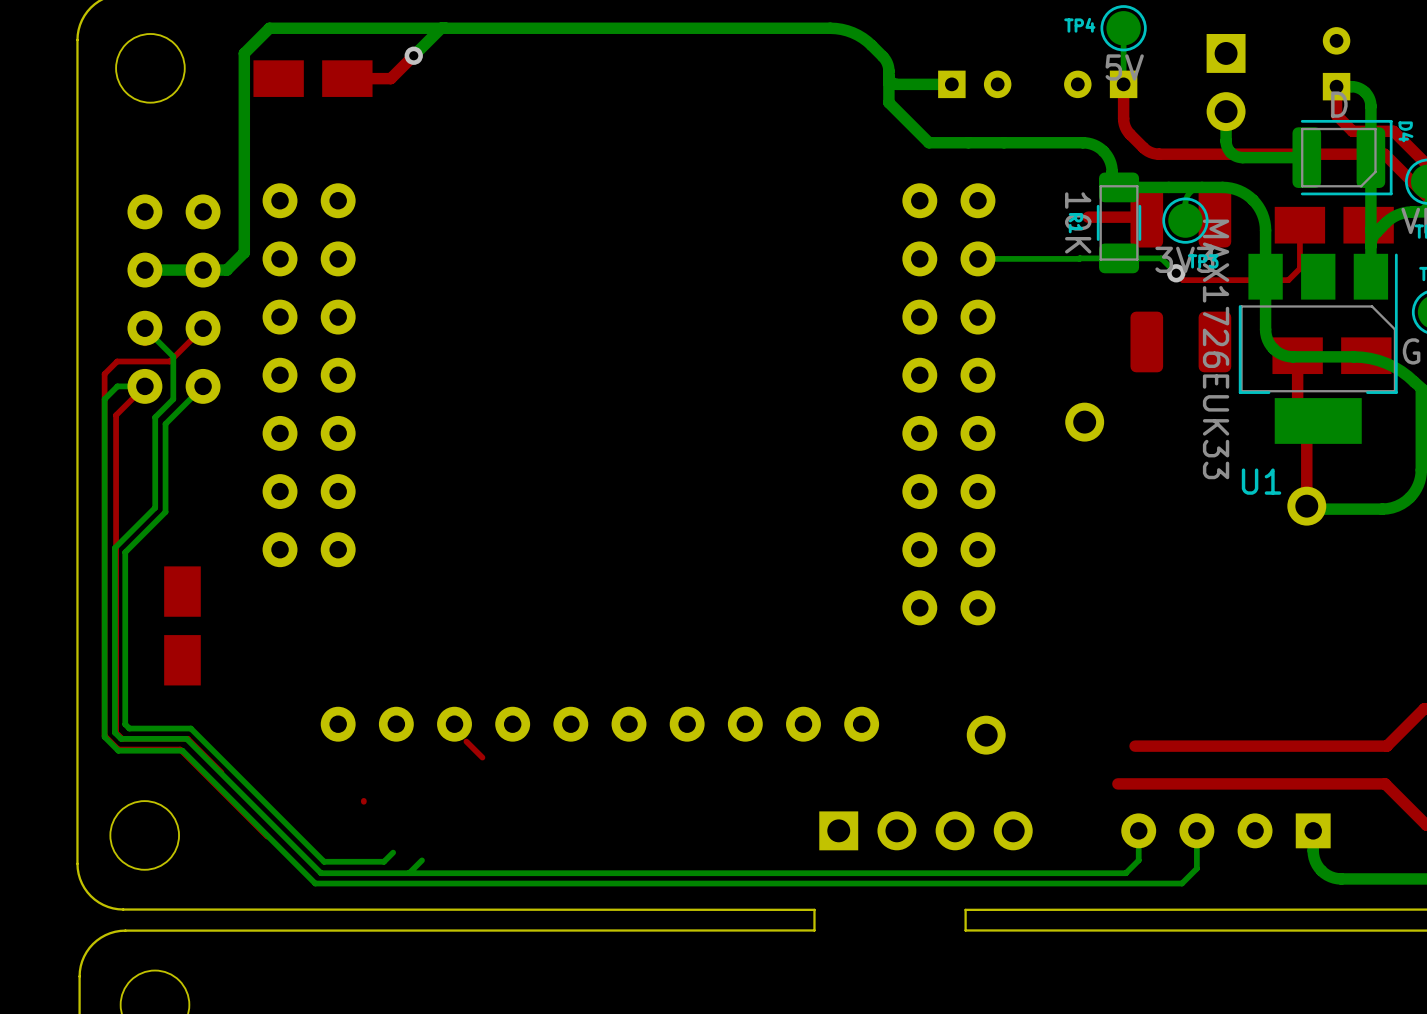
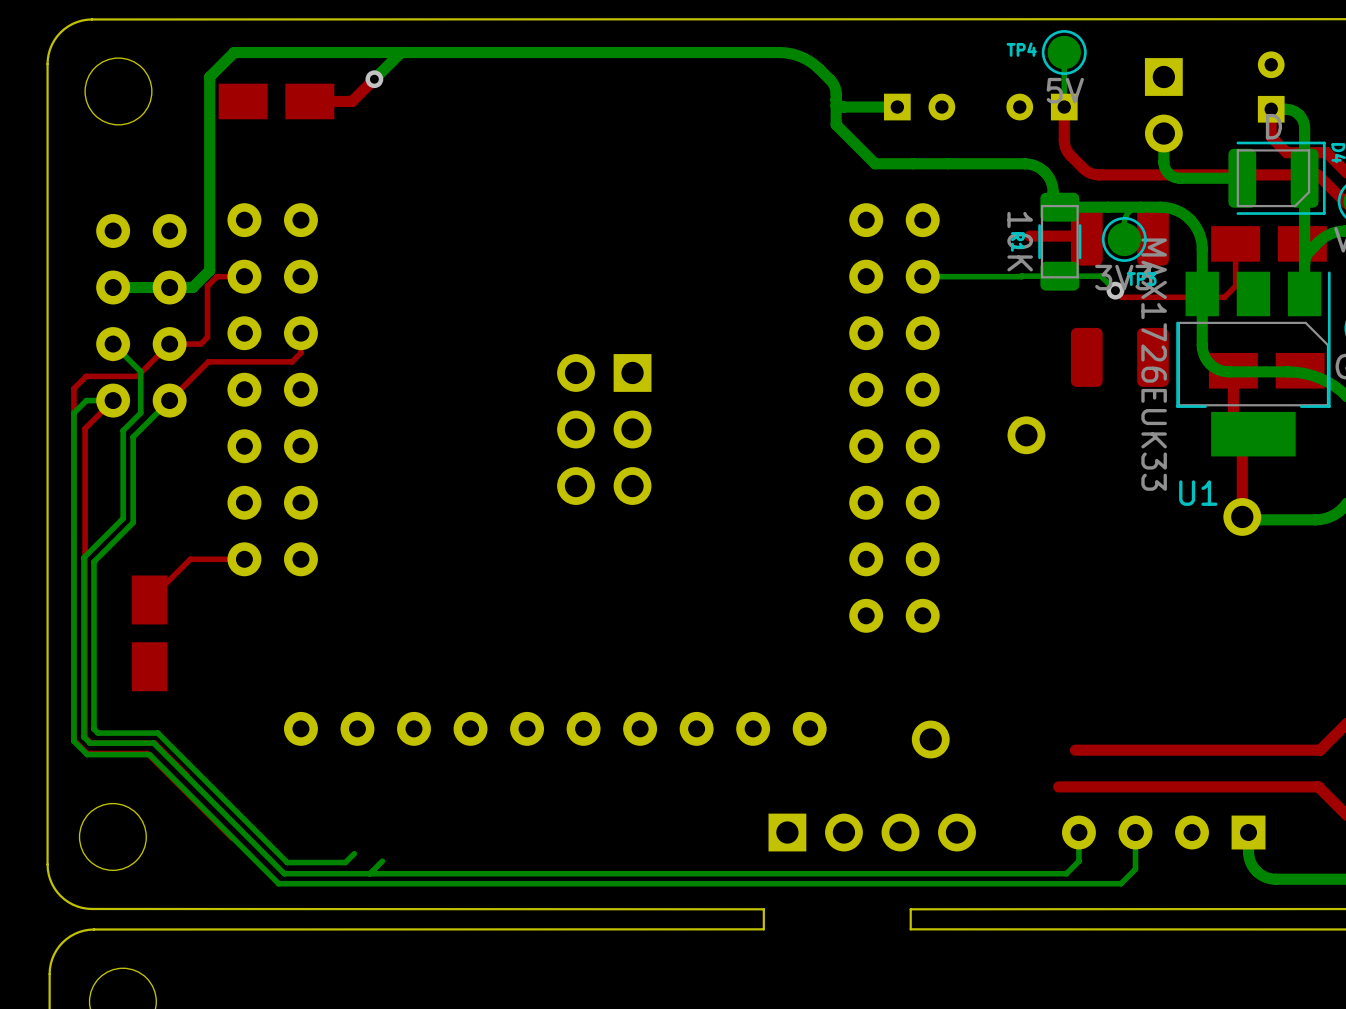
top track: none -> (244, 276) (217, 276) (207, 286) (207, 337) (200, 344) (174, 344)
top track: none -> (300, 333) (300, 352) (292, 361) (208, 361) (169, 400)
part: none -> (604, 429)
top track: none -> (244, 559) (190, 559) (149, 599)
top track: (466, 741) (482, 757) -> none
top track: (363, 800) (363, 801) -> none

